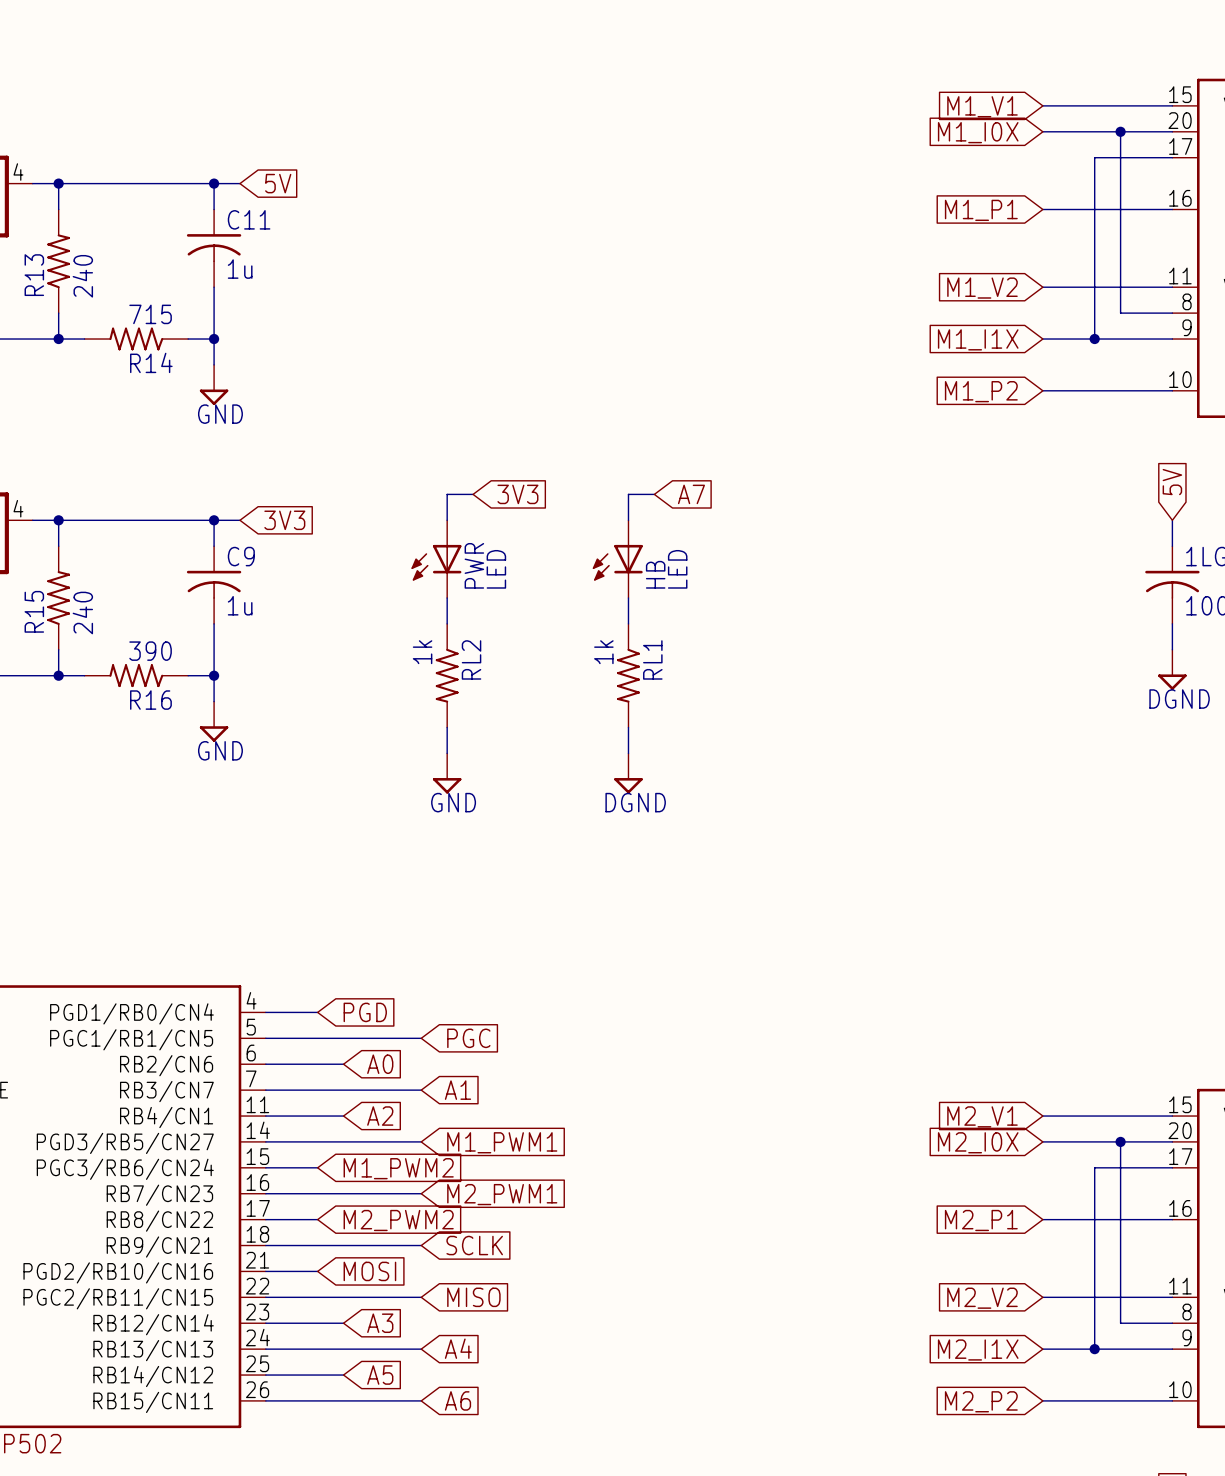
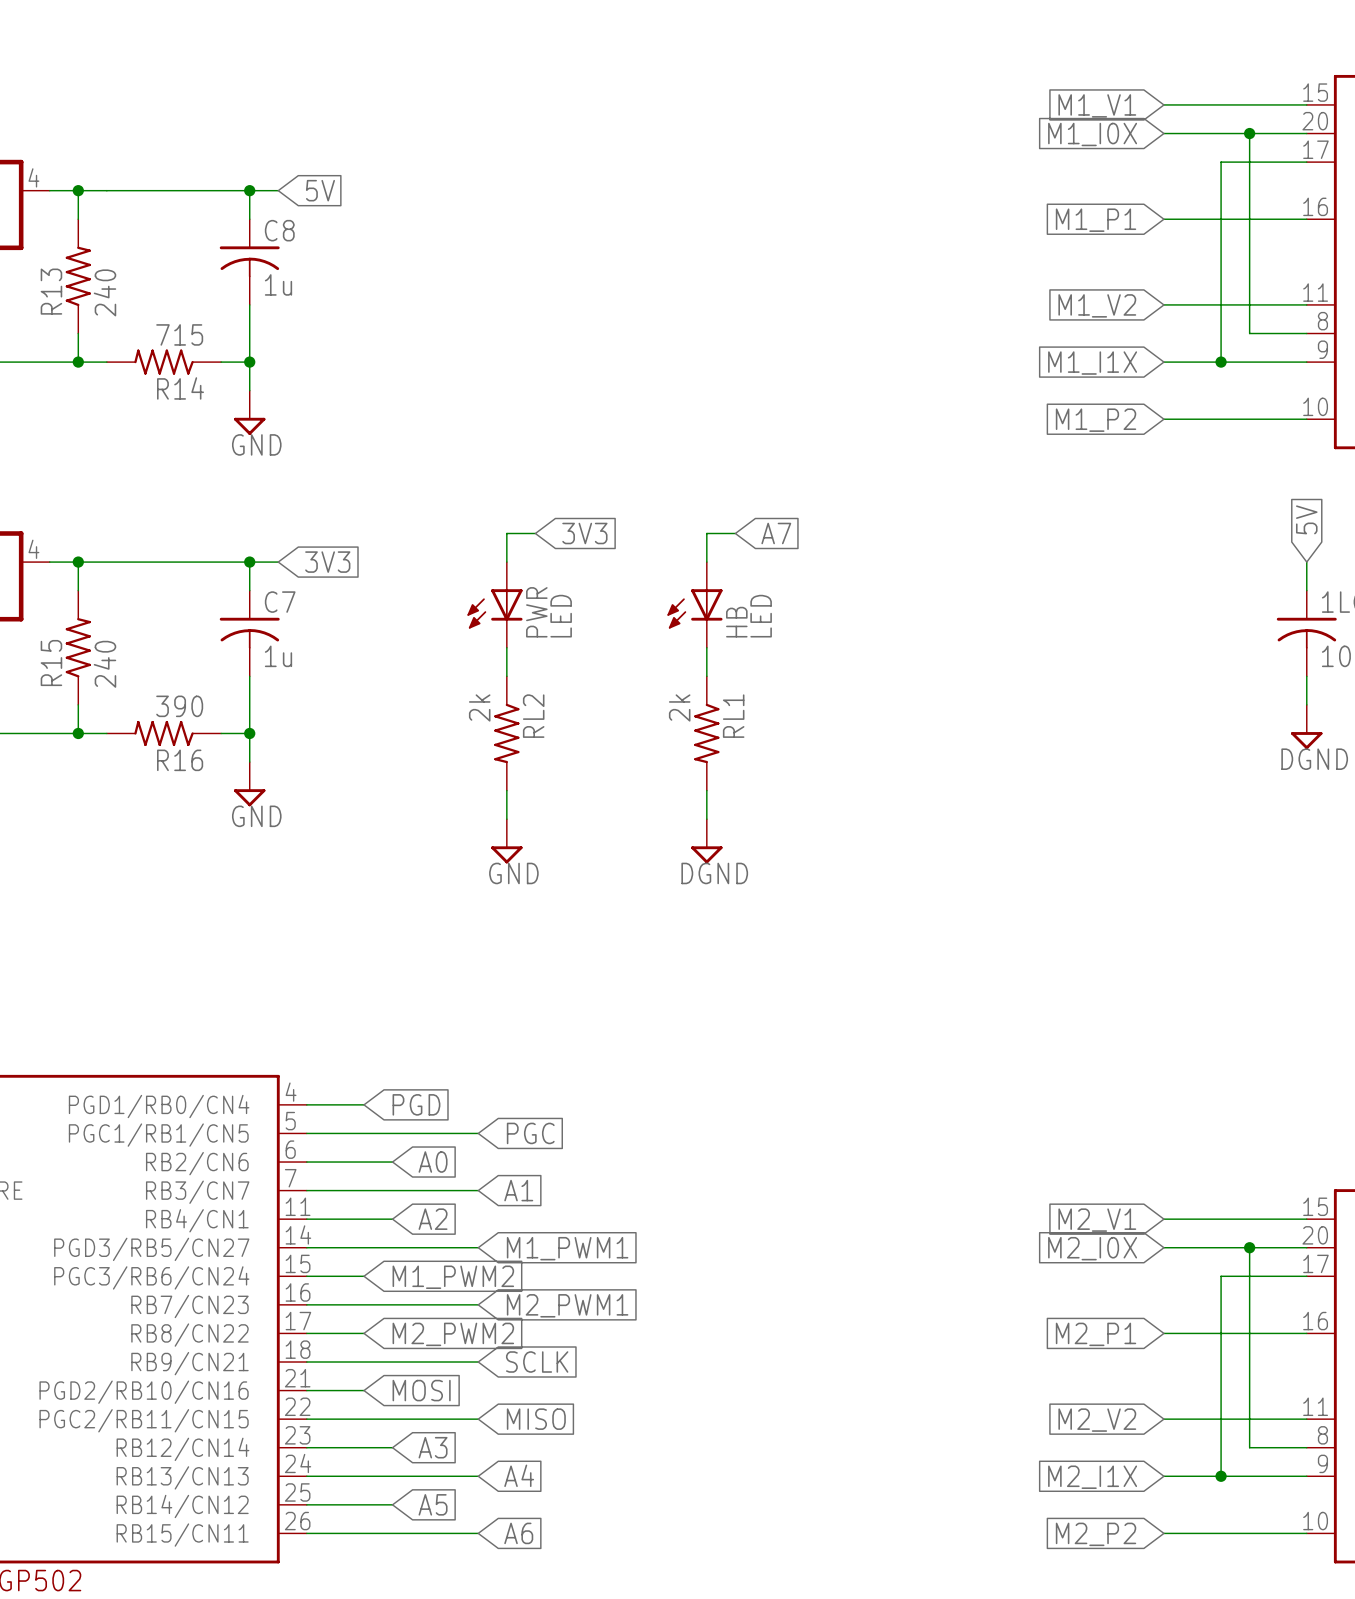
C11 name: C11 (249, 219) -> C8 (279, 230)
C9 name: C9 (241, 556) -> C7 (280, 602)
RL2 value: 1k (422, 652) -> 2k (479, 707)
RL1 value: 1k (603, 652) -> 2k (679, 707)

